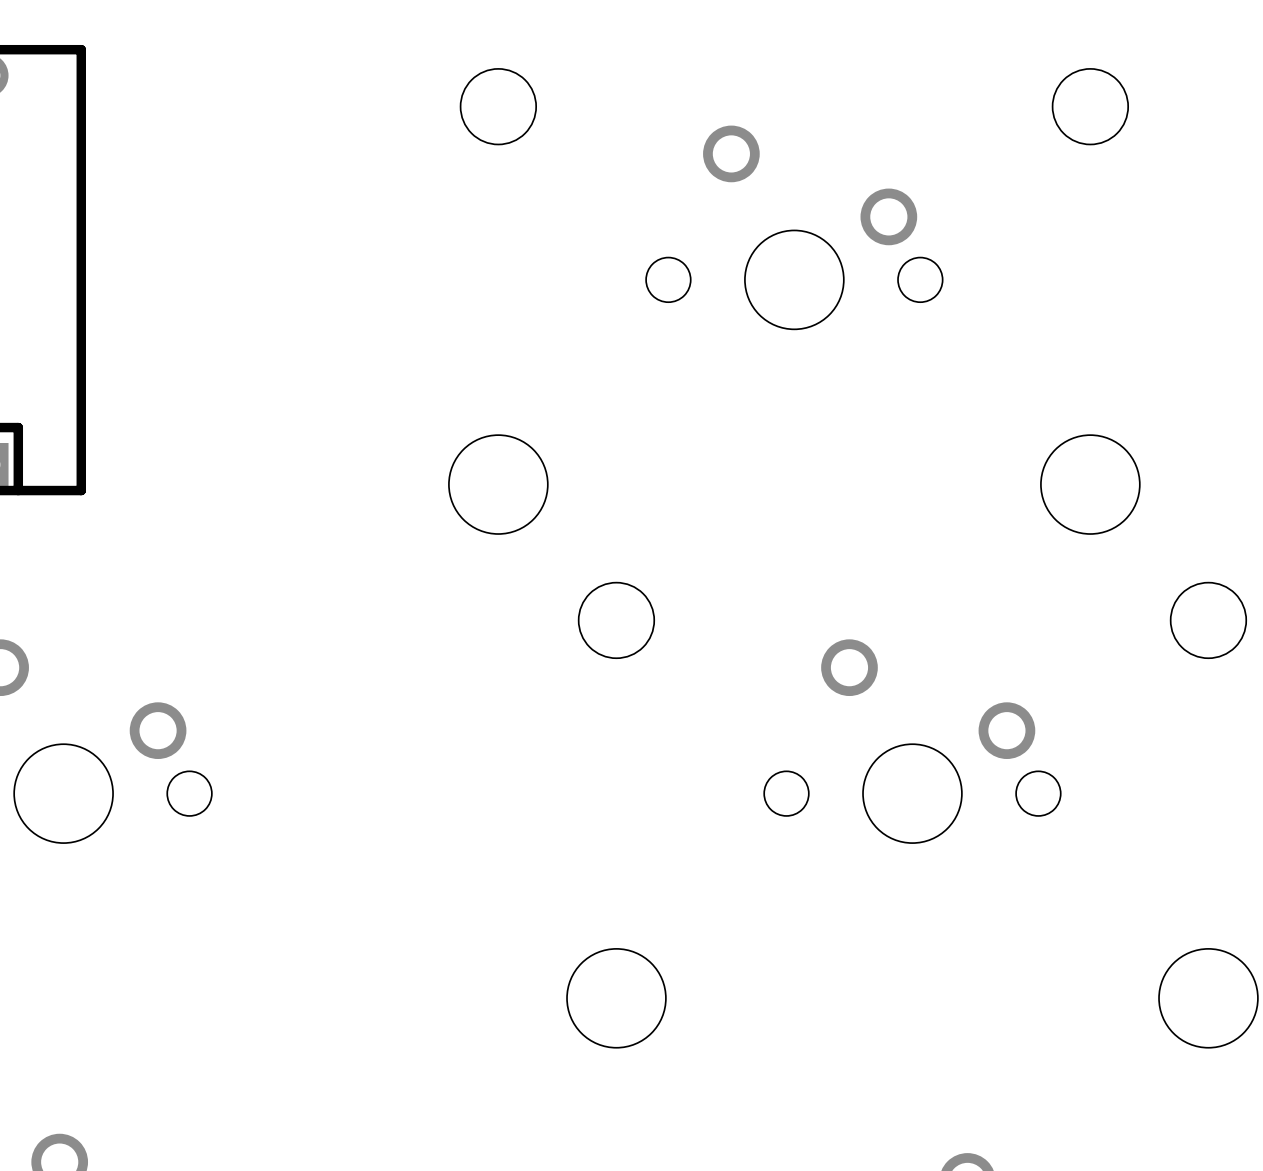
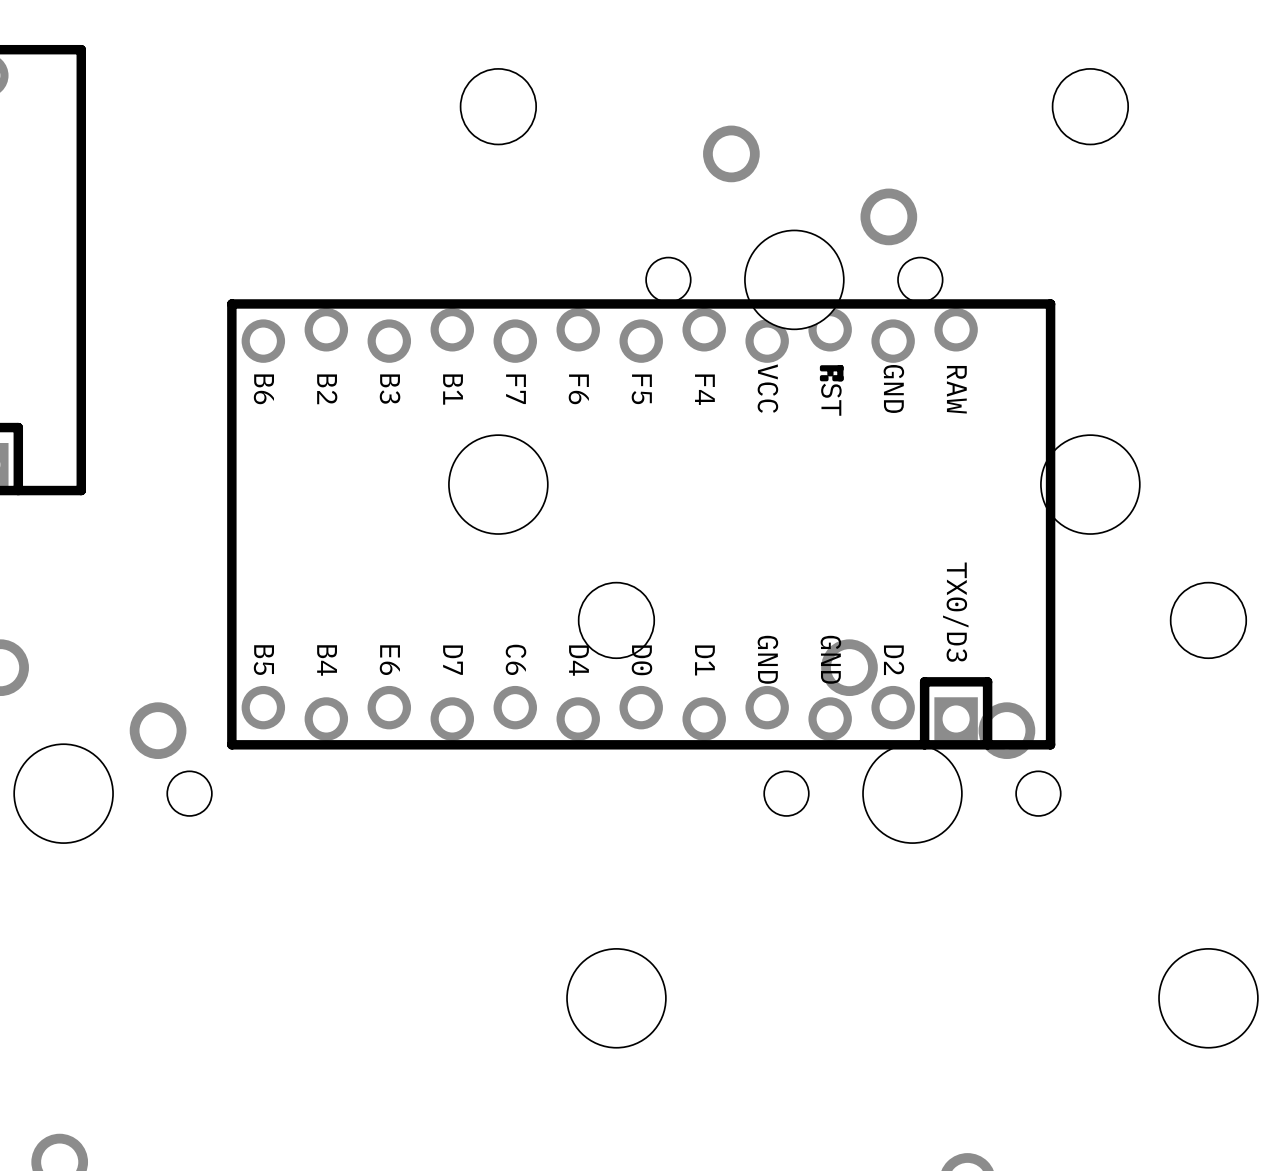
part: none -> (641, 524)

